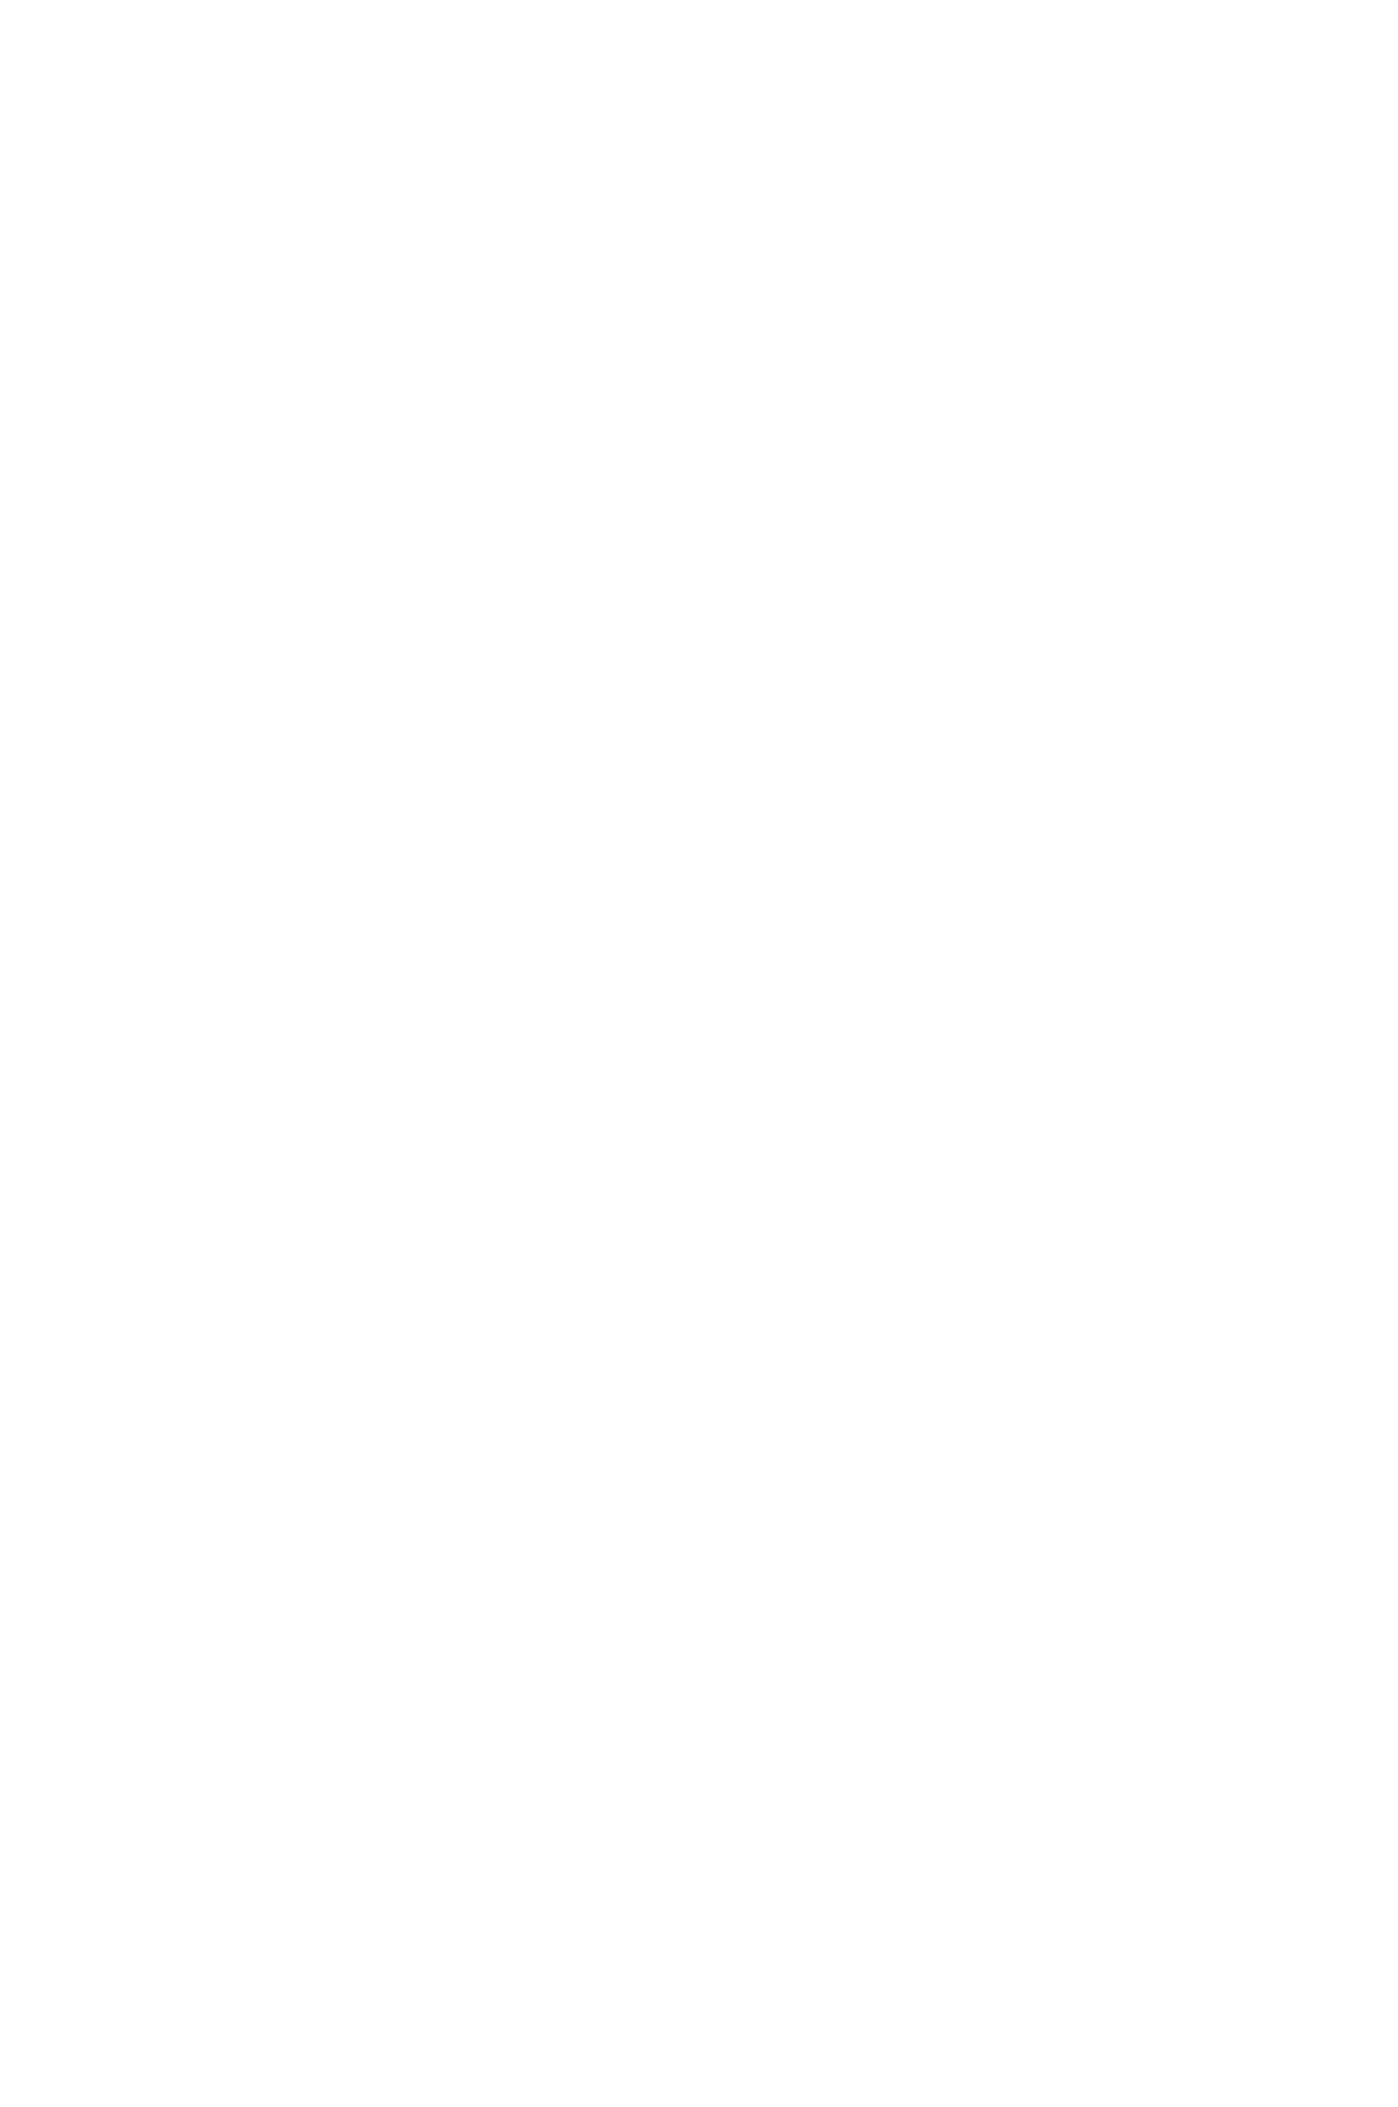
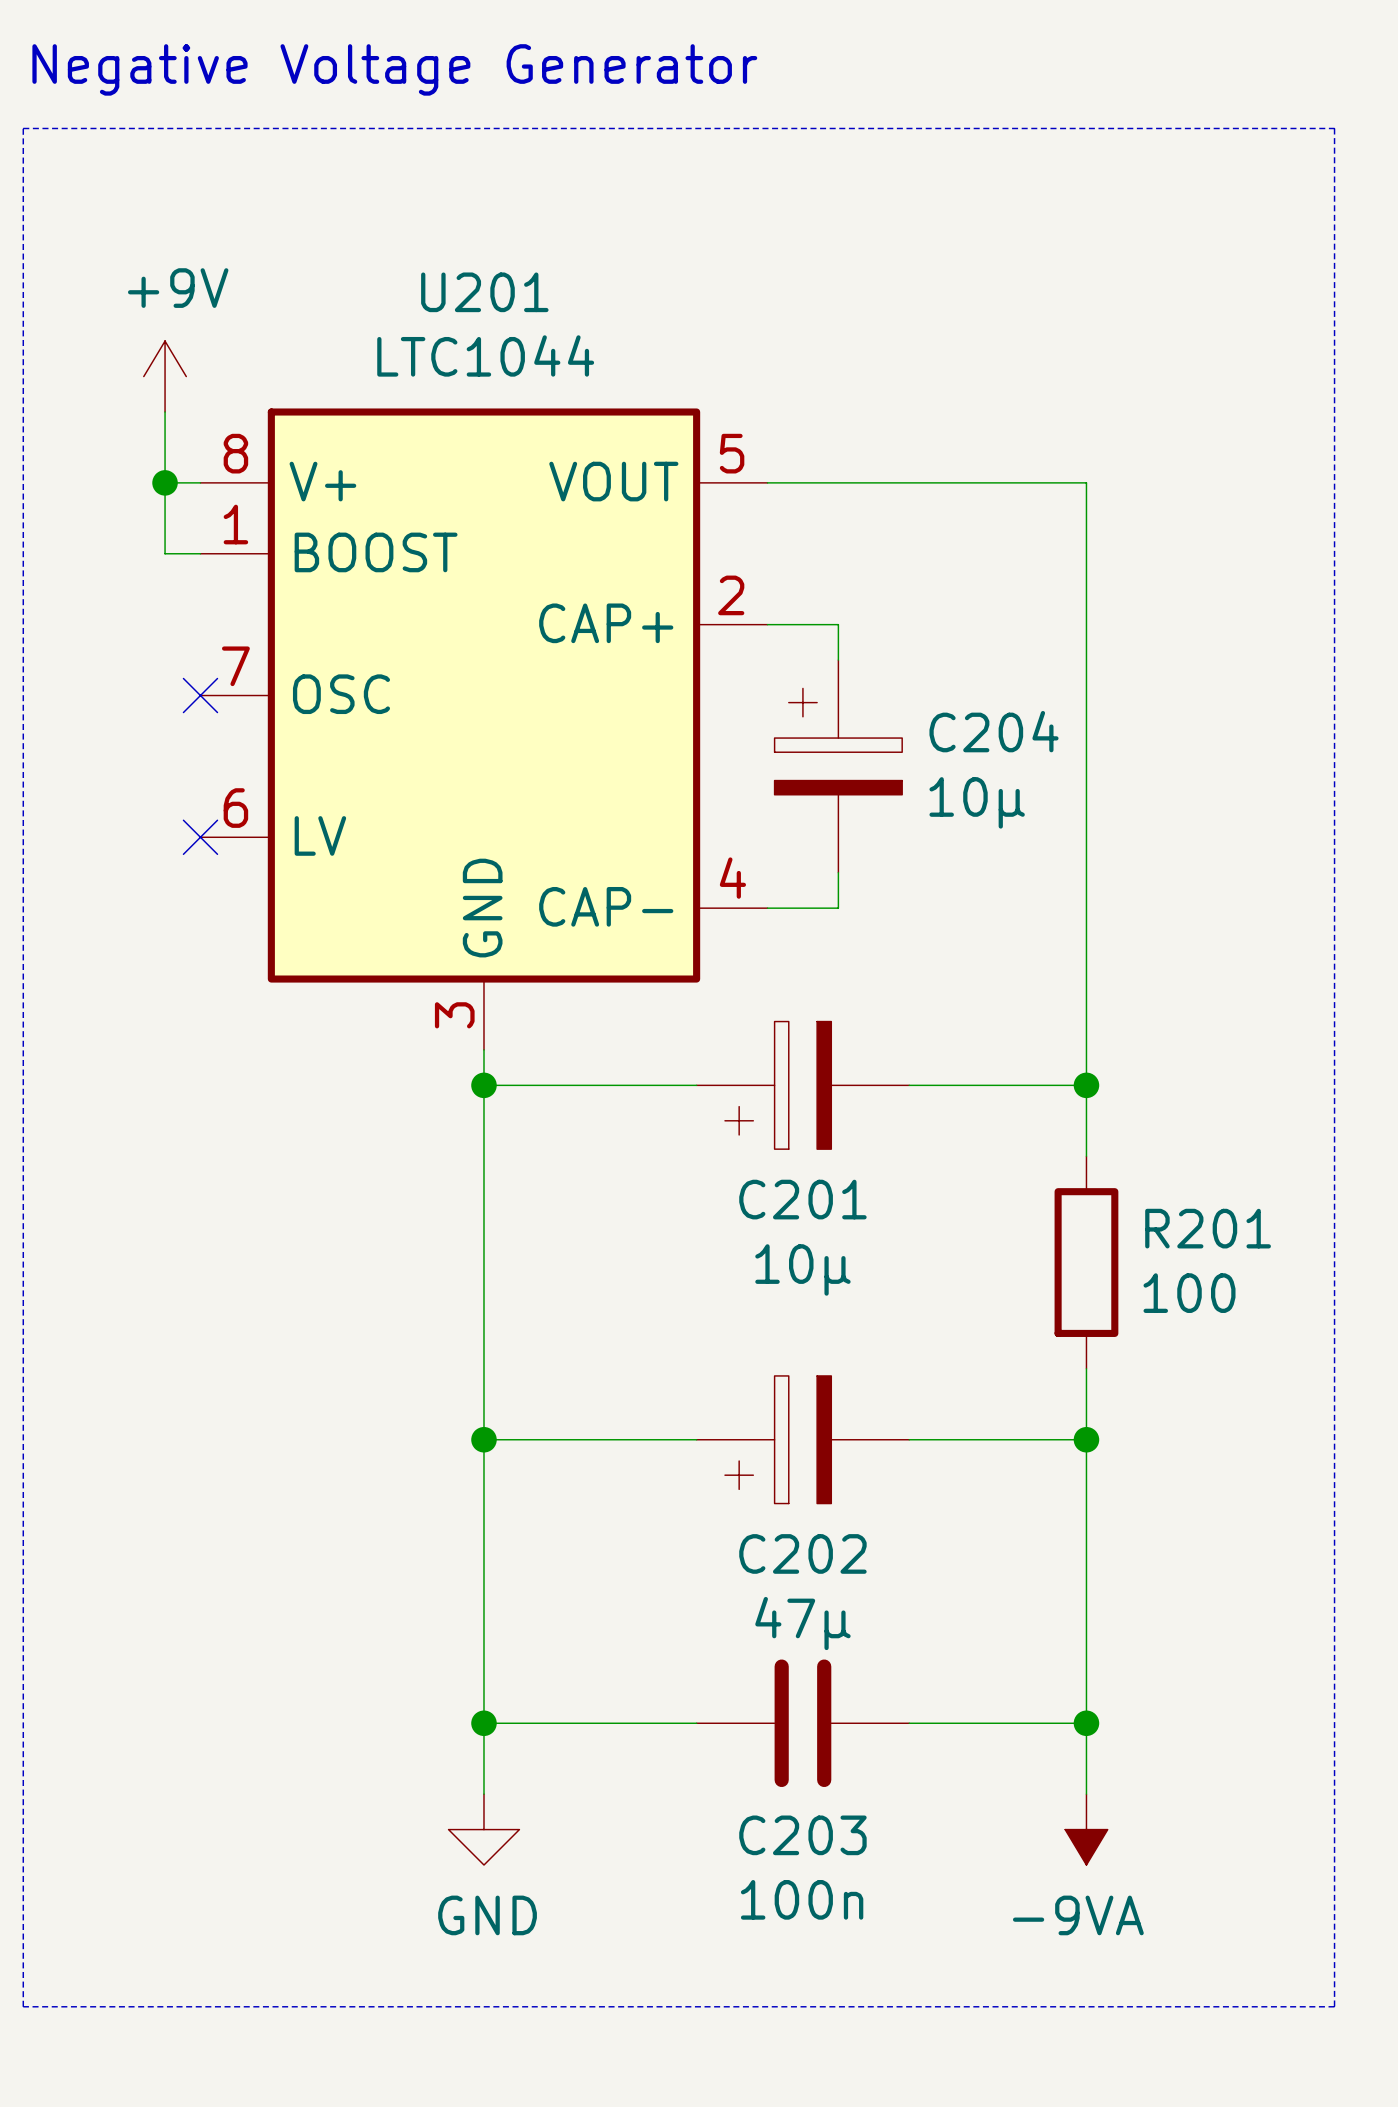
text: none -> Negative Voltage Generator (394, 69)
line: none -> (23, 128) (1334, 128) (1334, 2006) (23, 2006) (23, 128)
power symbol: none -> +9V (165, 376)
wire: none -> (165, 412) (165, 553) (200, 553)
wire: none -> (165, 482) (200, 482)
junction: none -> (165, 482)
wire: none -> (767, 482) (1086, 482) (1086, 1156)
wire: none -> (767, 624) (838, 624) (838, 660)
no-connect mark: none -> (200, 695)
U201: none -> LTC1044 (483, 729)
C204: none -> 10µ (838, 766)
no-connect mark: none -> (200, 837)
wire: none -> (838, 872) (838, 908) (767, 908)
wire: none -> (483, 1049) (483, 1794)
wire: none -> (483, 1085) (696, 1085)
junction: none -> (483, 1085)
C201: none -> 10µ (802, 1085)
wire: none -> (909, 1085) (1086, 1085)
junction: none -> (1086, 1085)
R201: none -> 100 (1086, 1262)
wire: none -> (1086, 1368) (1086, 1794)
wire: none -> (483, 1439) (696, 1439)
junction: none -> (483, 1439)
C202: none -> 47µ (802, 1439)
wire: none -> (909, 1439) (1086, 1439)
junction: none -> (1086, 1439)
wire: none -> (483, 1723) (696, 1723)
junction: none -> (483, 1723)
C203: none -> 100n (802, 1723)
wire: none -> (909, 1723) (1086, 1723)
junction: none -> (1086, 1723)
power symbol: none -> GND (483, 1829)
power symbol: none -> -9VA (1086, 1829)

